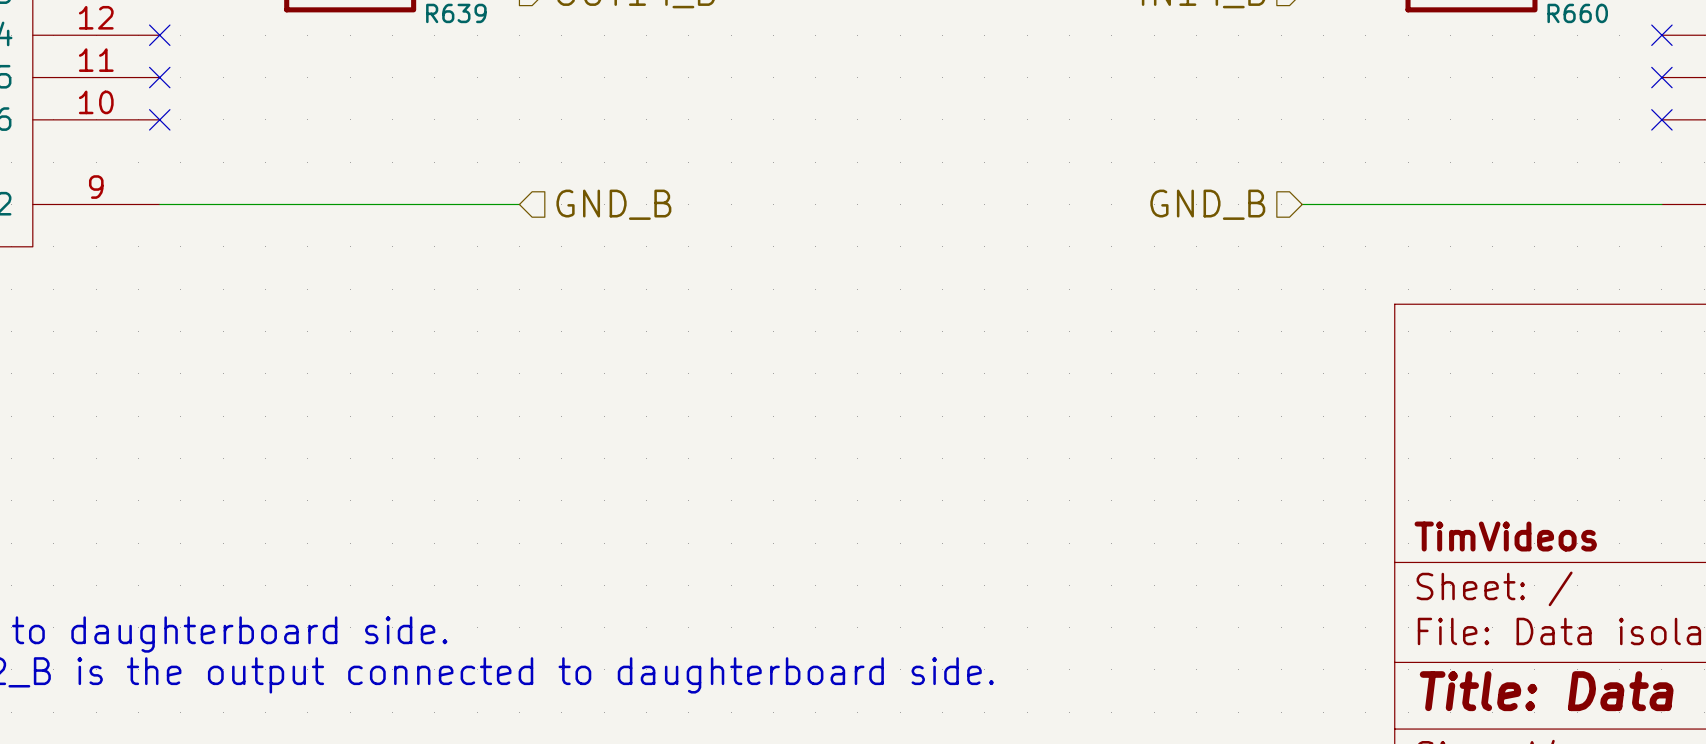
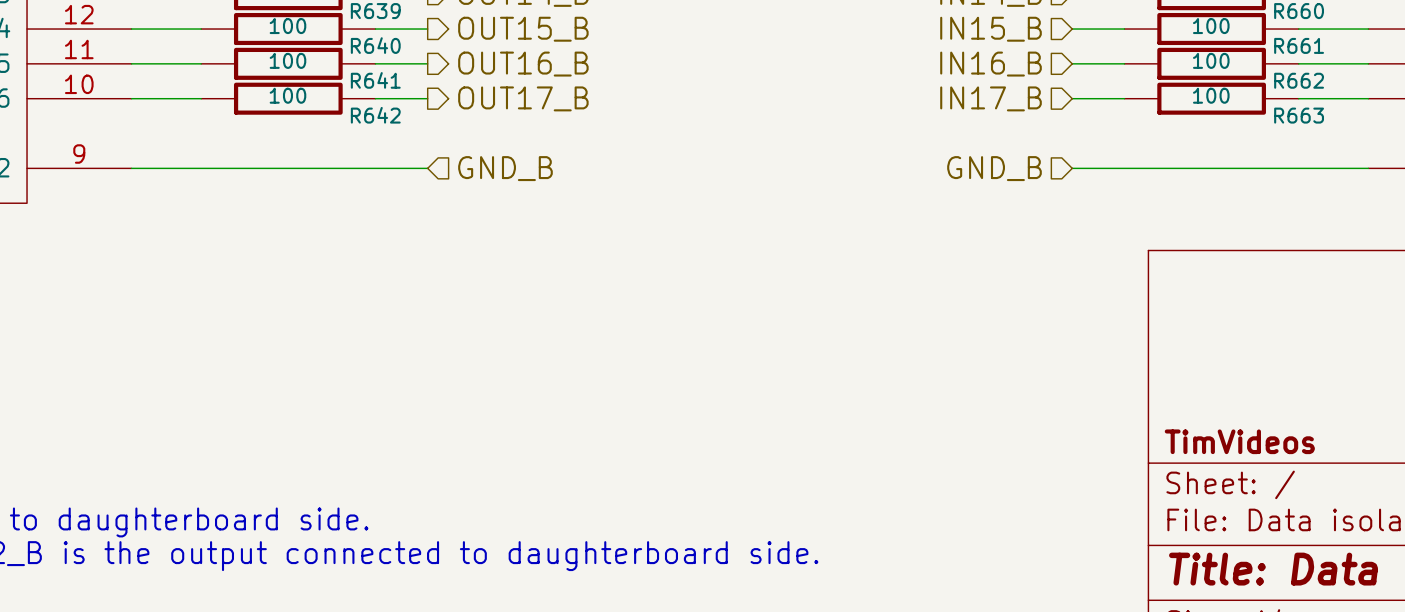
wire: none -> (131, 29) (201, 29)
no-connect mark: (159, 35) -> none
R640: none -> 100 (288, 29)
wire: none -> (375, 29) (427, 29)
hierarchical label: none -> OUT15_B (523, 29)
hierarchical label: none -> IN15_B (991, 29)
wire: none -> (1072, 29) (1124, 29)
R661: none -> 100 (1211, 29)
wire: none -> (1298, 29) (1368, 29)
no-connect mark: (1661, 35) -> none
wire: none -> (131, 63) (201, 63)
no-connect mark: (159, 77) -> none
R641: none -> 100 (288, 63)
wire: none -> (375, 63) (427, 63)
hierarchical label: none -> OUT16_B (523, 64)
hierarchical label: none -> IN16_B (991, 64)
wire: none -> (1072, 63) (1124, 63)
R662: none -> 100 (1211, 63)
wire: none -> (1298, 63) (1368, 63)
no-connect mark: (1661, 77) -> none
wire: none -> (131, 98) (201, 98)
no-connect mark: (159, 119) -> none
R642: none -> 100 (288, 98)
wire: none -> (375, 98) (427, 98)
wire: none -> (1072, 98) (1124, 98)
R663: none -> 100 (1211, 98)
wire: none -> (1298, 98) (1368, 98)
no-connect mark: (1661, 119) -> none
hierarchical label: none -> OUT17_B (523, 98)
hierarchical label: none -> IN17_B (991, 98)

